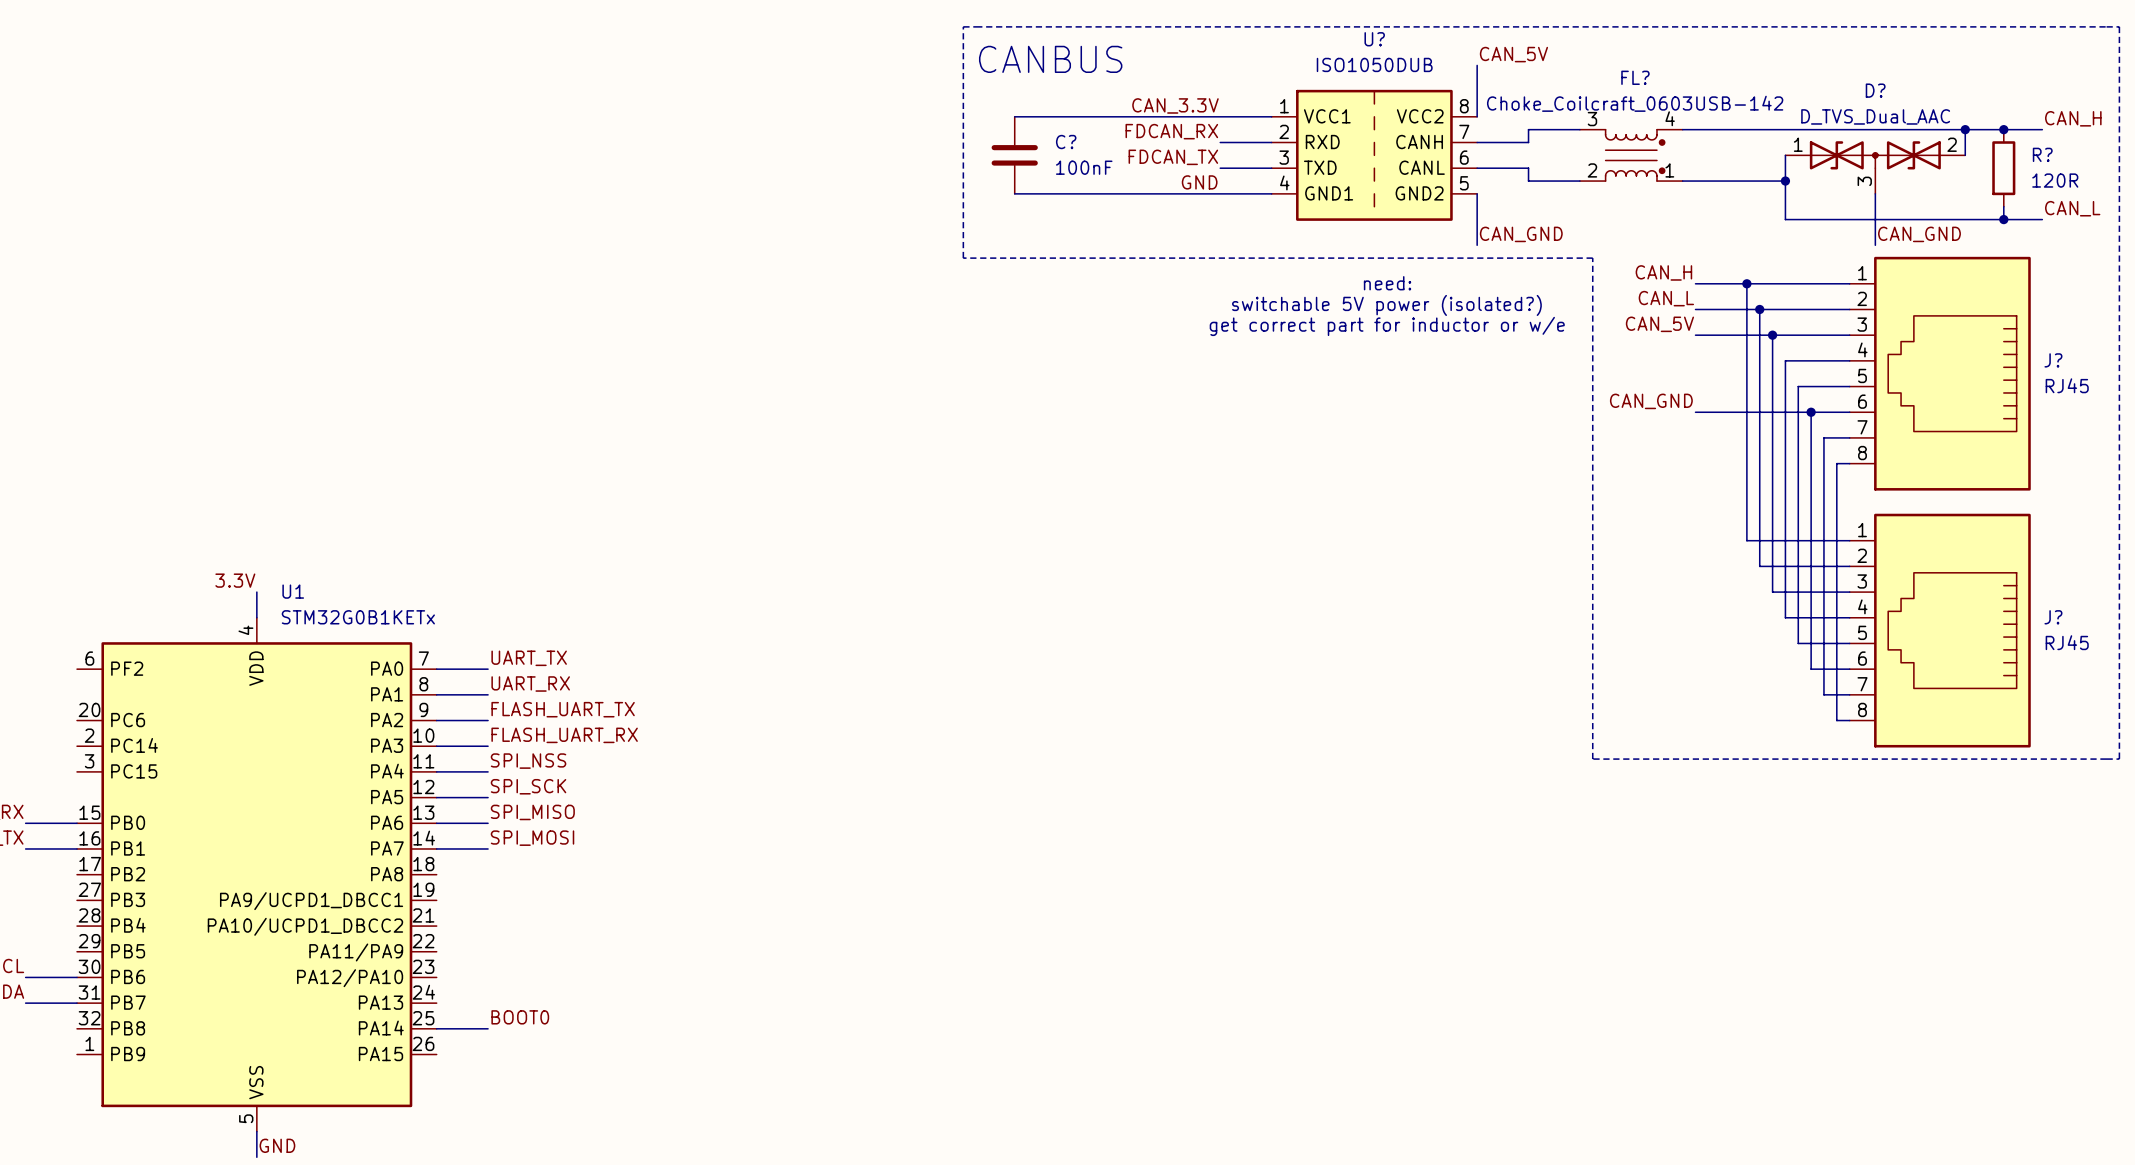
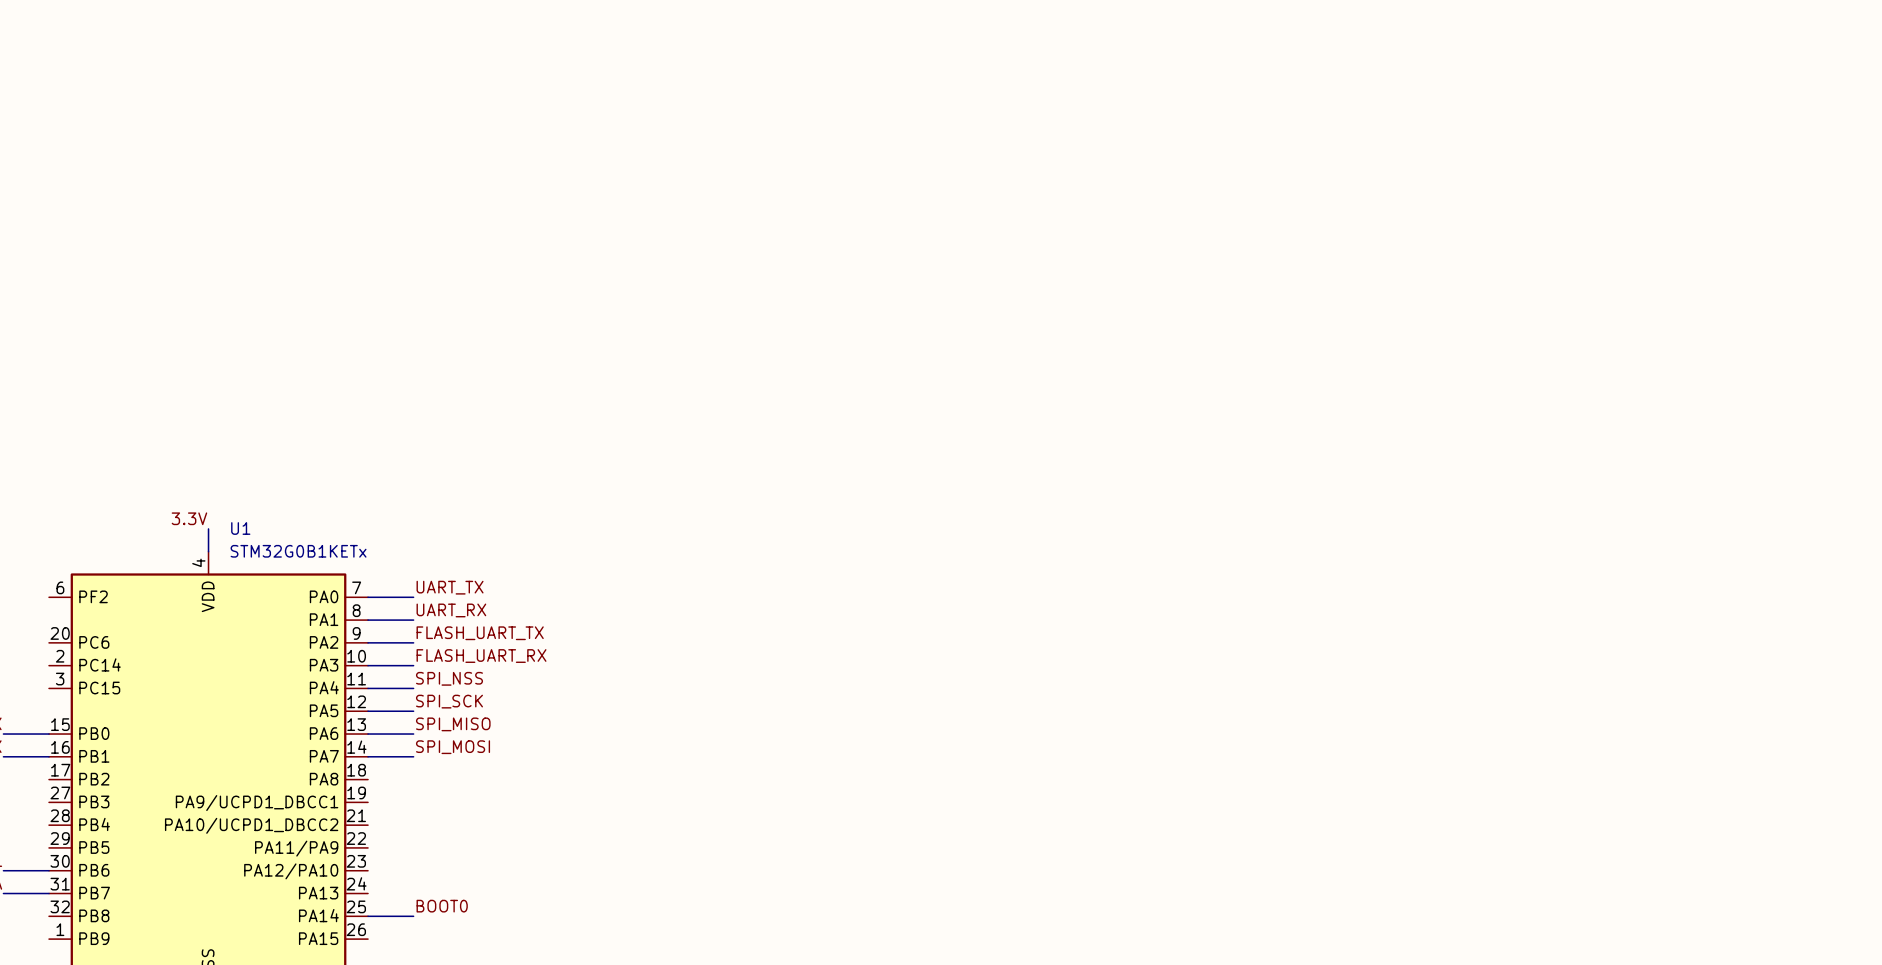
line: (963, 26) (2119, 26) (2119, 759) (1592, 759) (1592, 258) (963, 258) (963, 26) -> none
label: CAN_5V (1513, 54) -> none
text: CANBUS (1050, 59) -> none
wire: (1477, 65) (1477, 116) -> none
label: CAN_3.3V (1175, 105) -> none
wire: (1014, 116) (1271, 116) -> none
label: CAN_H (2073, 118) -> none
wire: (1579, 129) (1528, 129) (1528, 142) (1477, 142) -> none
wire: (1682, 129) (2042, 129) -> none
wire: (1965, 129) (1965, 155) -> none
junction: (1965, 129) -> none
junction: (2003, 129) -> none
label: FDCAN_RX (1171, 131) -> none
wire: (1220, 142) (1271, 142) -> none
C?: 100nF (1014, 155) -> none
U?: ISO1050DUB (1374, 155) -> none
FL?: Choke_Coilcraft_0603USB-142 (1631, 155) -> none
wire: (1785, 155) (1785, 219) (2042, 219) -> none
label: FDCAN_TX (1173, 157) -> none
D?: D_TVS_Dual_AAC (1875, 167) -> none
wire: (1220, 168) (1271, 168) -> none
wire: (1477, 168) (1528, 168) (1528, 181) (1579, 181) -> none
R?: 120R (2003, 168) -> none
wire: (1682, 181) (1785, 181) -> none
junction: (1785, 181) -> none
label: GND (1199, 182) -> none
wire: (1014, 193) (1271, 193) -> none
wire: (1477, 193) (1477, 245) -> none
wire: (1875, 193) (1875, 245) -> none
wire: (2003, 206) (2003, 219) -> none
label: CAN_L (2072, 208) -> none
junction: (2003, 219) -> none
label: CAN_GND (1521, 234) -> none
label: CAN_GND (1919, 234) -> none
label: CAN_H (1663, 272) -> none
text: need: (1387, 283) -> none
wire: (1695, 283) (1849, 283) -> none
wire: (1746, 283) (1746, 540) (1849, 540) -> none
junction: (1746, 283) -> none
label: CAN_L (1666, 298) -> none
text: switchable 5V power (isolated?) (1386, 305) -> none
wire: (1695, 309) (1849, 309) -> none
wire: (1759, 309) (1759, 566) (1849, 566) -> none
junction: (1759, 309) -> none
label: CAN_5V (1659, 324) -> none
text: get correct part for inductor or w/e (1387, 326) -> none
wire: (1695, 335) (1849, 335) -> none
wire: (1772, 335) (1772, 592) (1849, 592) -> none
junction: (1772, 335) -> none
wire: (1849, 360) (1785, 360) (1785, 617) (1849, 617) -> none
J?: RJ45 (1940, 373) -> none
wire: (1849, 386) (1798, 386) (1798, 643) (1849, 643) -> none
label: CAN_GND (1651, 401) -> none
wire: (1695, 412) (1849, 412) -> none
wire: (1811, 412) (1811, 669) (1849, 669) -> none
junction: (1811, 412) -> none
wire: (1849, 437) (1823, 437) (1823, 694) (1849, 694) -> none
wire: (1849, 463) (1836, 463) (1836, 720) (1849, 720) -> none
J?: RJ45 (1940, 630) -> none

